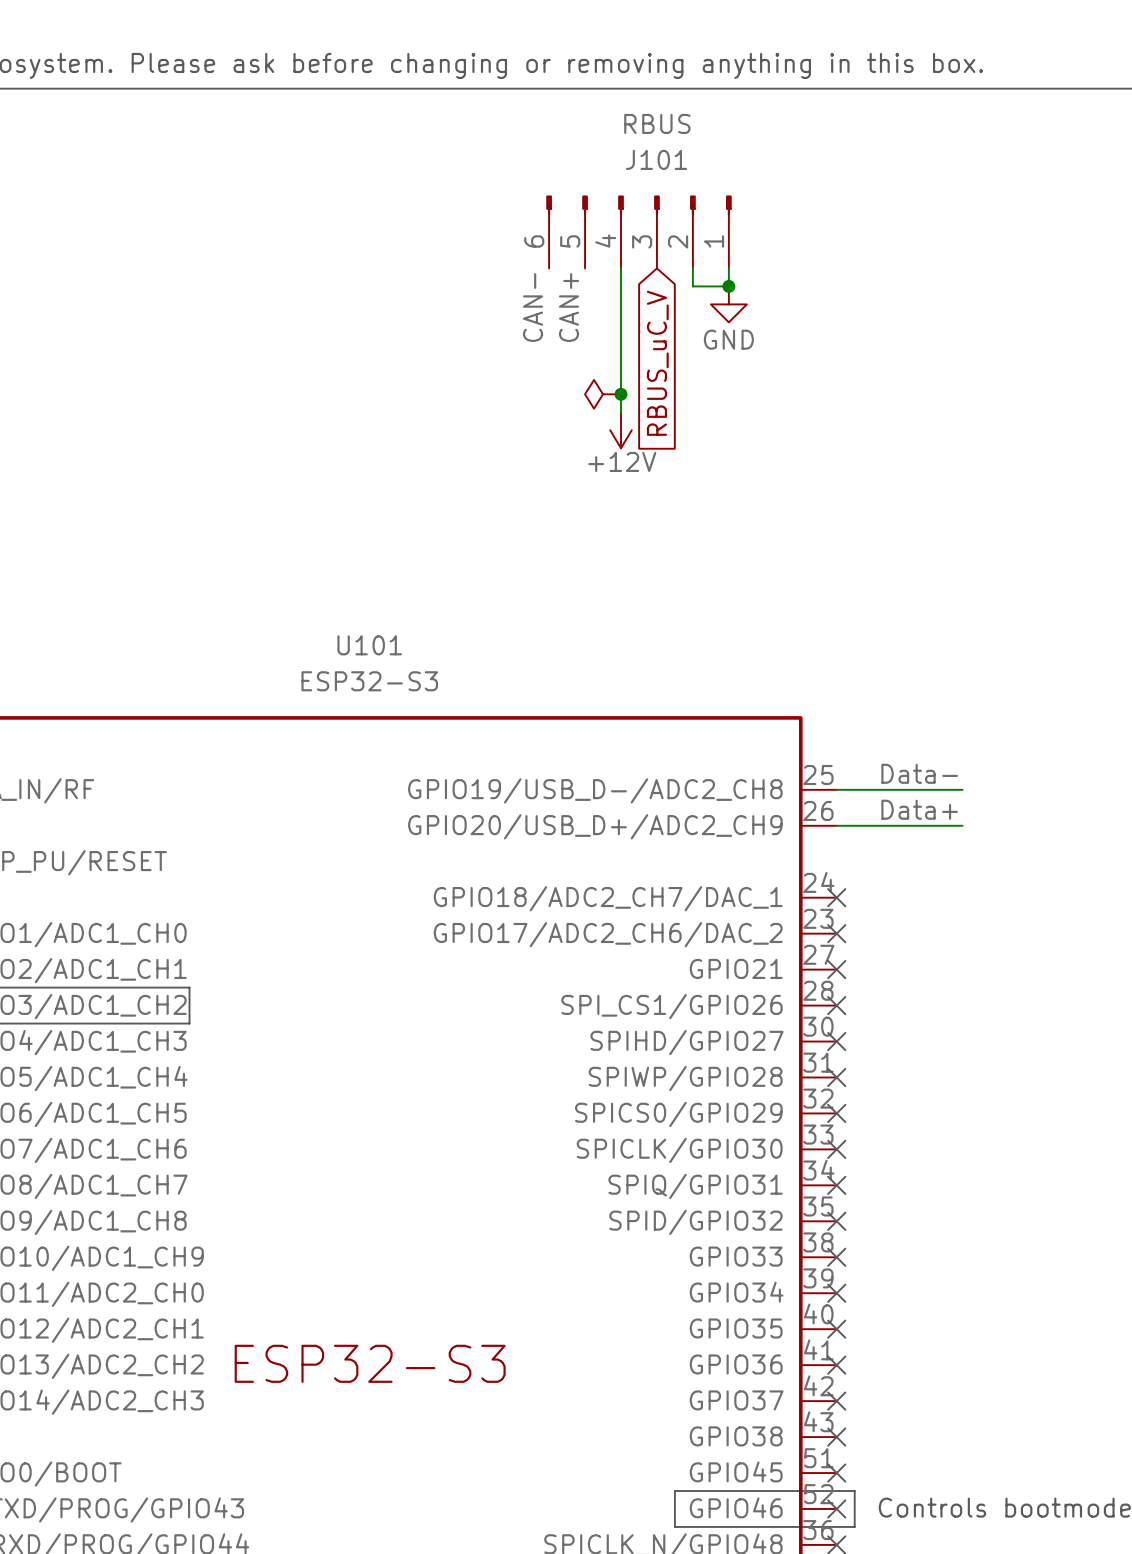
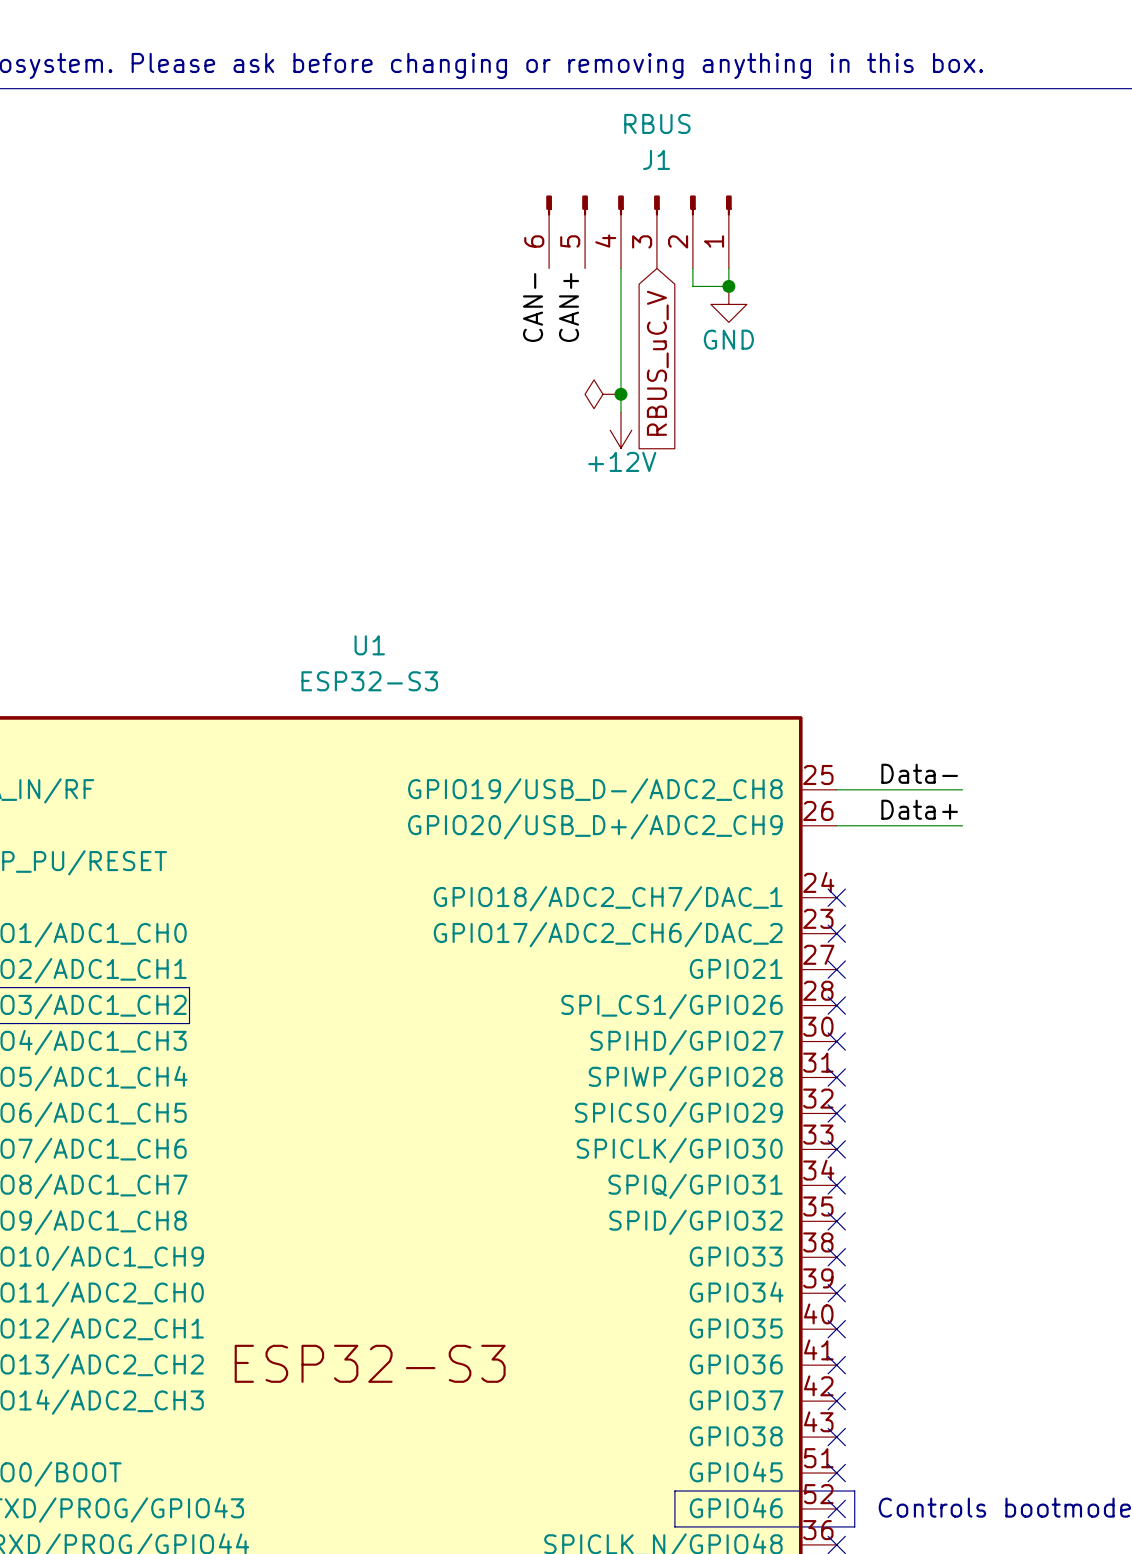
J101 name: J101 (656, 159) -> J1 (656, 159)
U101 name: U101 (369, 645) -> U1 (369, 645)

